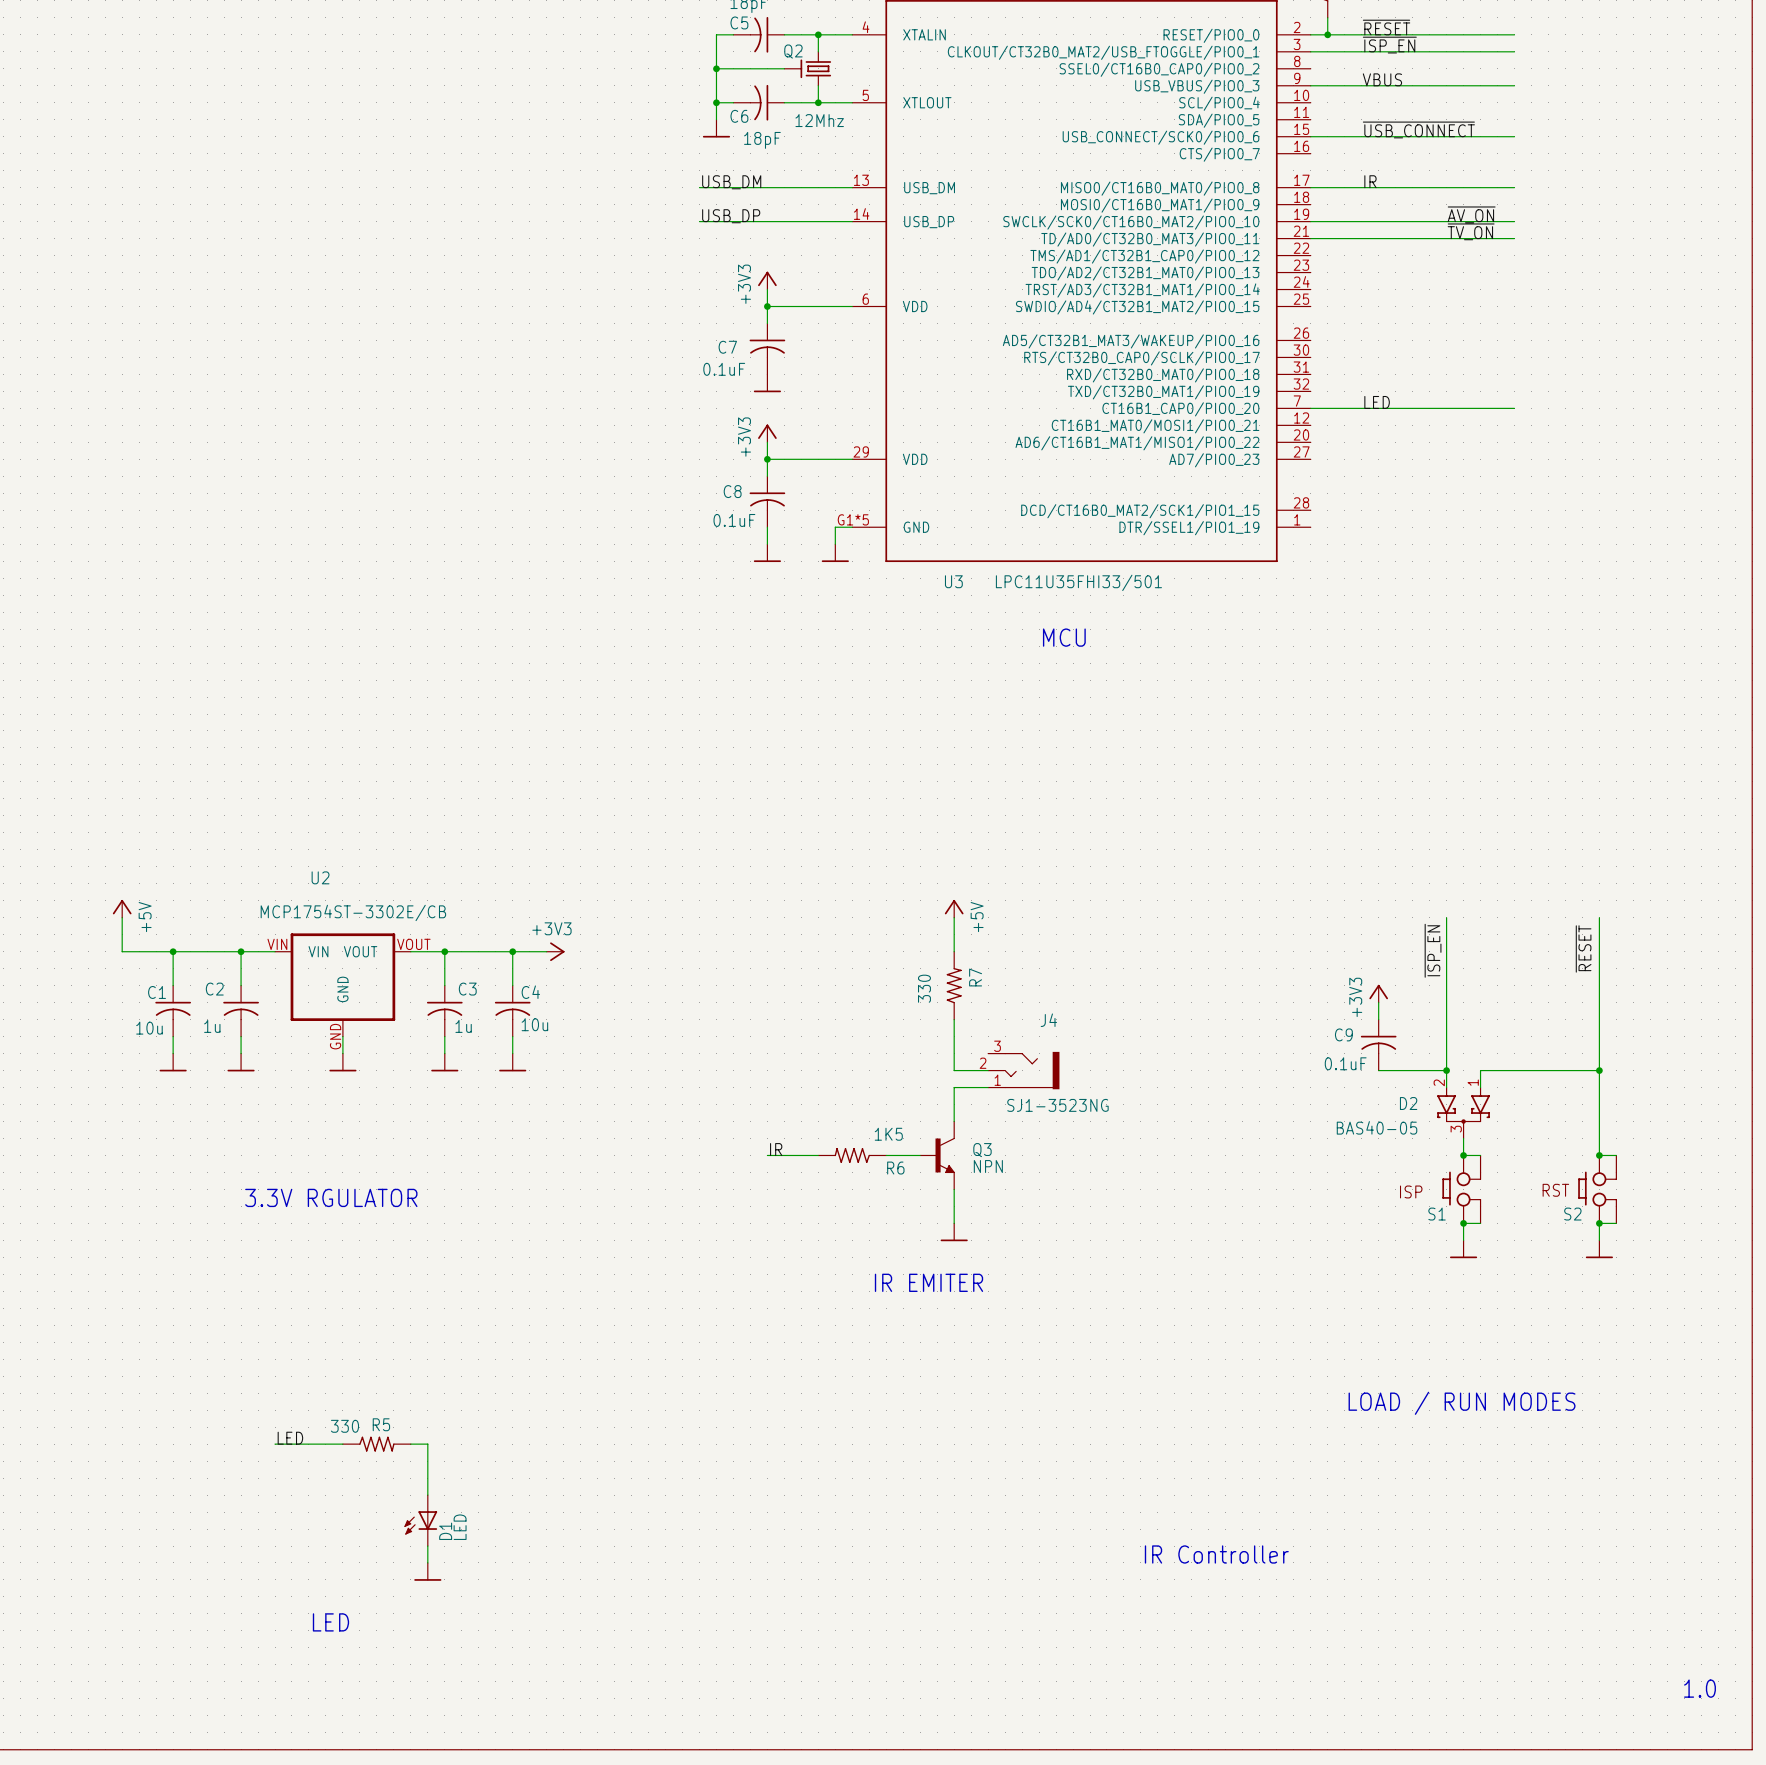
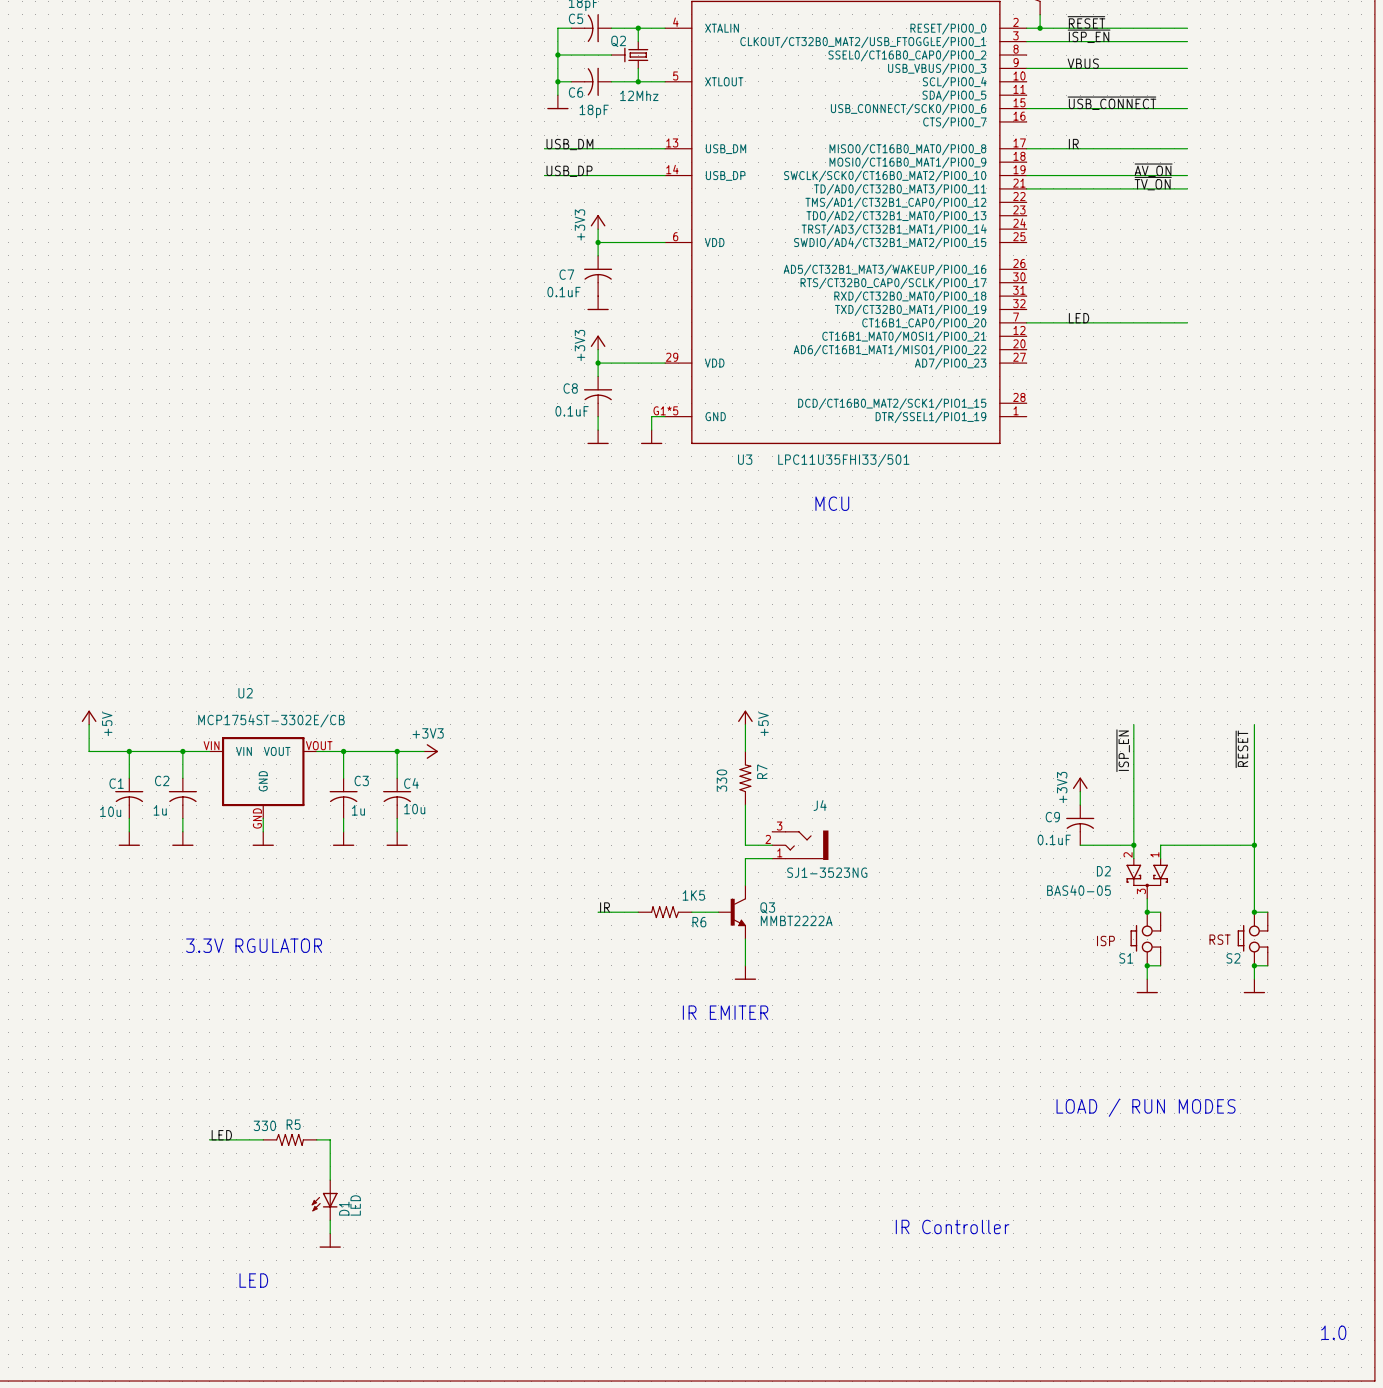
Q3 value: NPN (988, 1166) -> MMBT2222A (796, 920)

